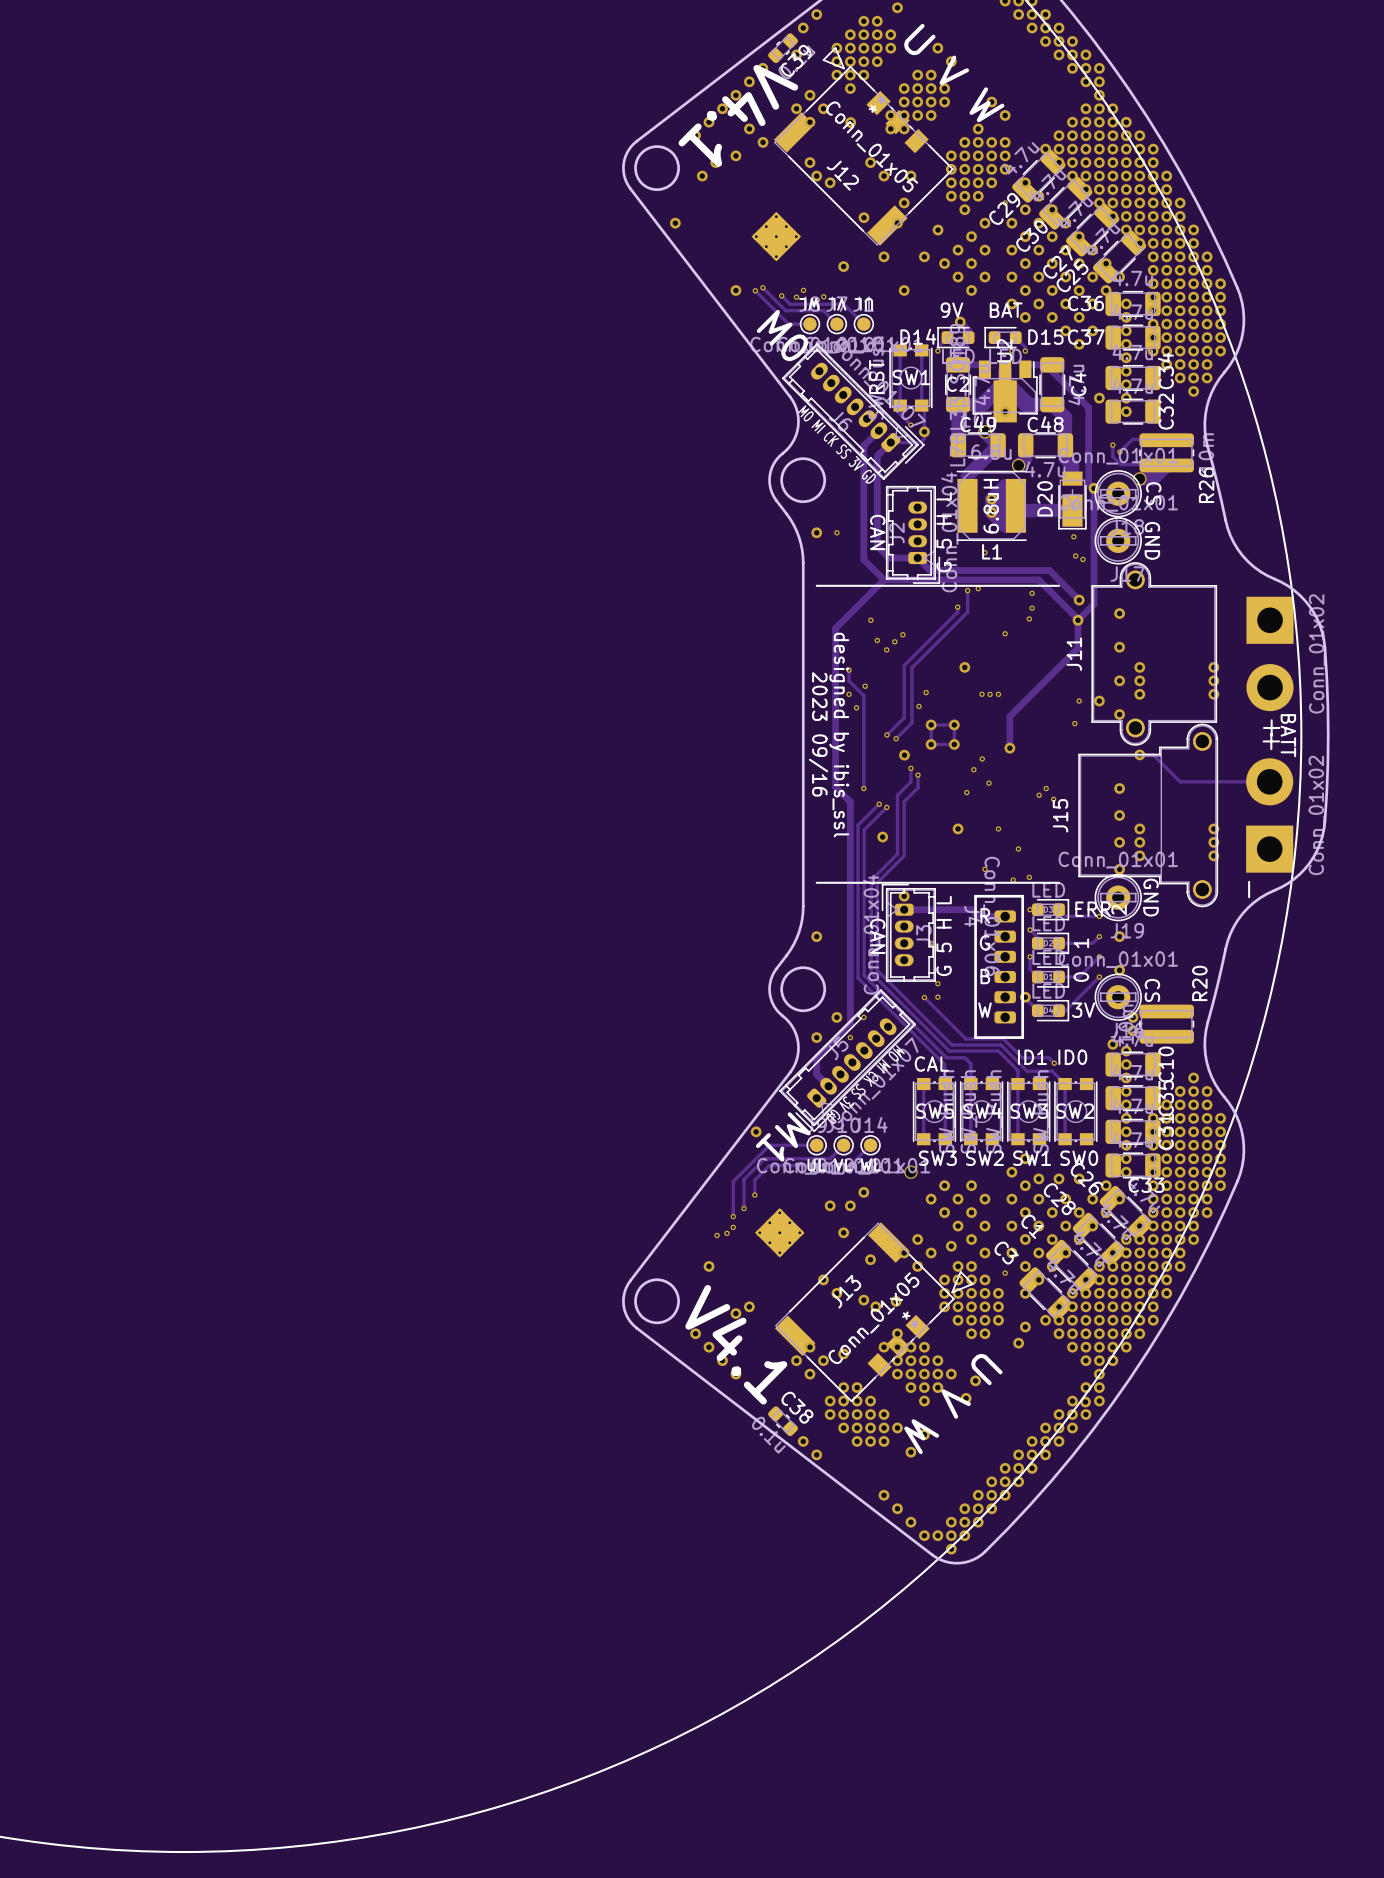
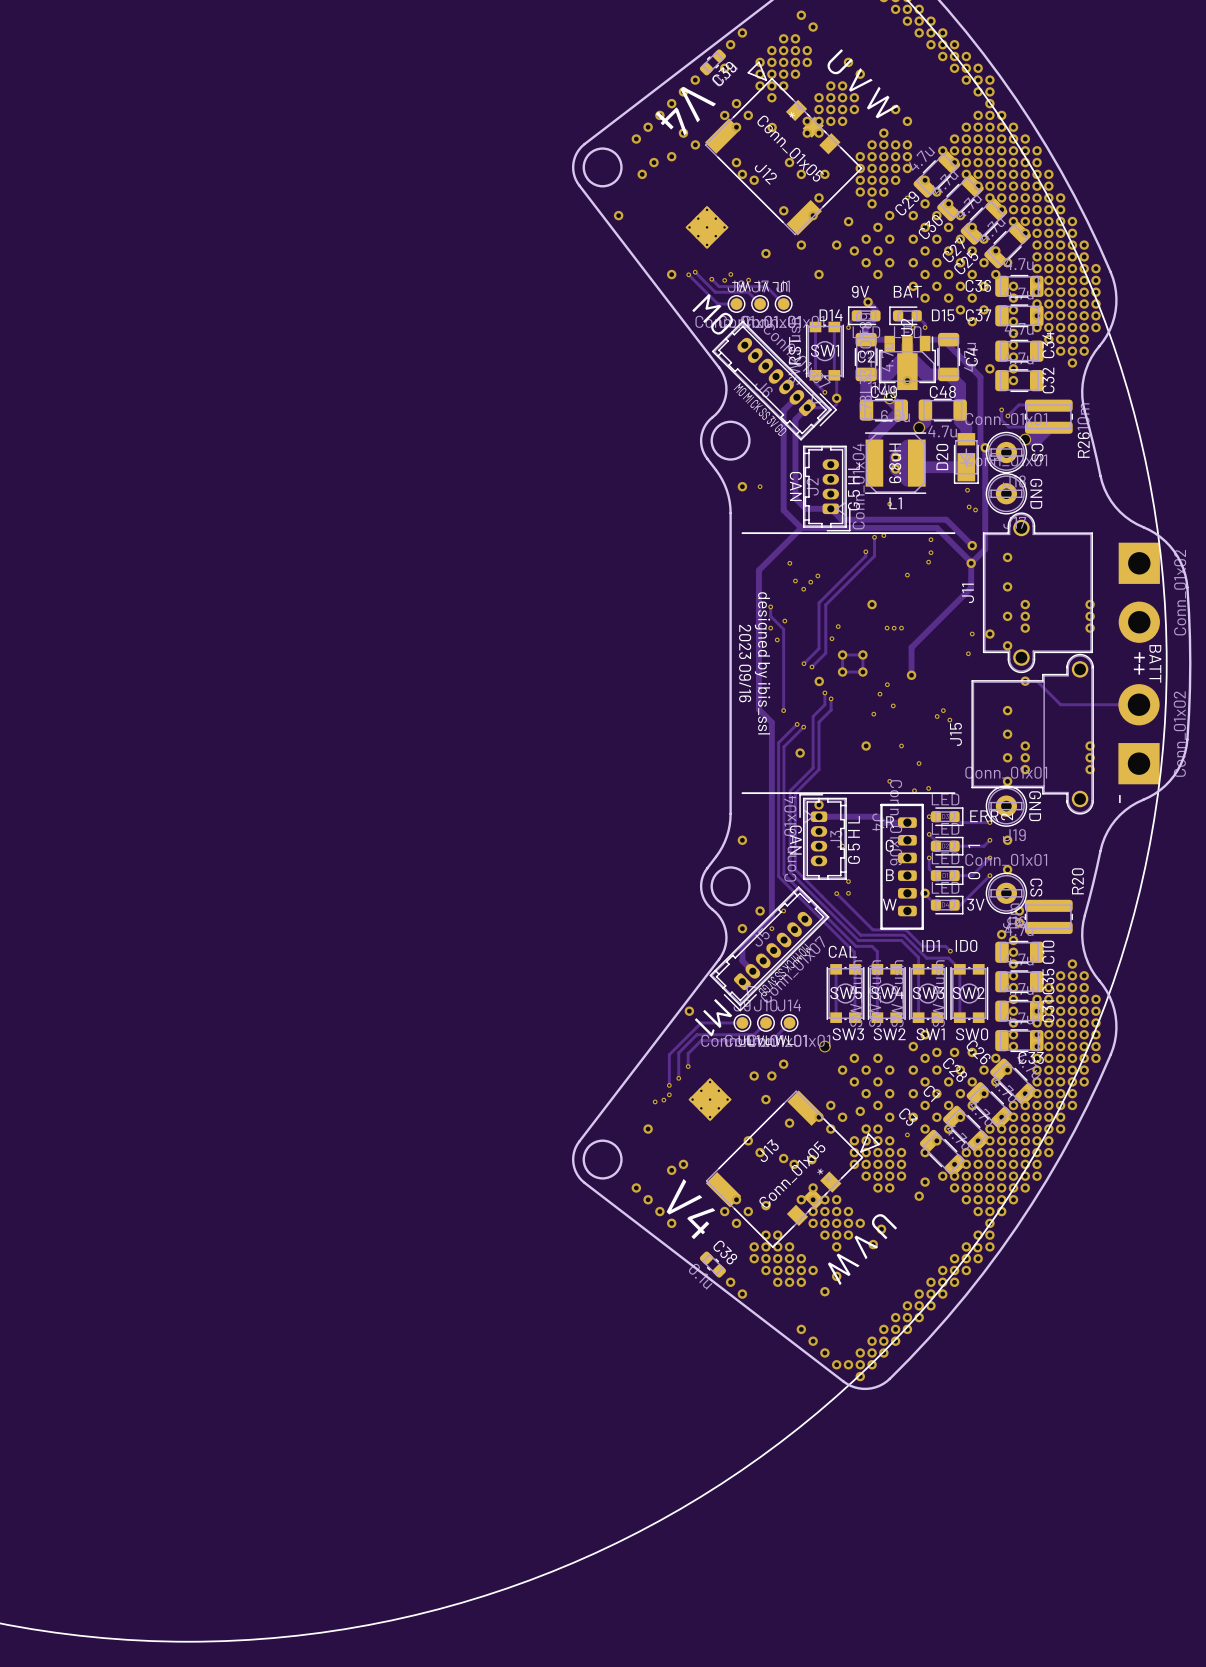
text: V4.1 (738, 115) -> V4 (685, 111)
text: V4.1 (736, 1344) -> V4 (690, 1209)

